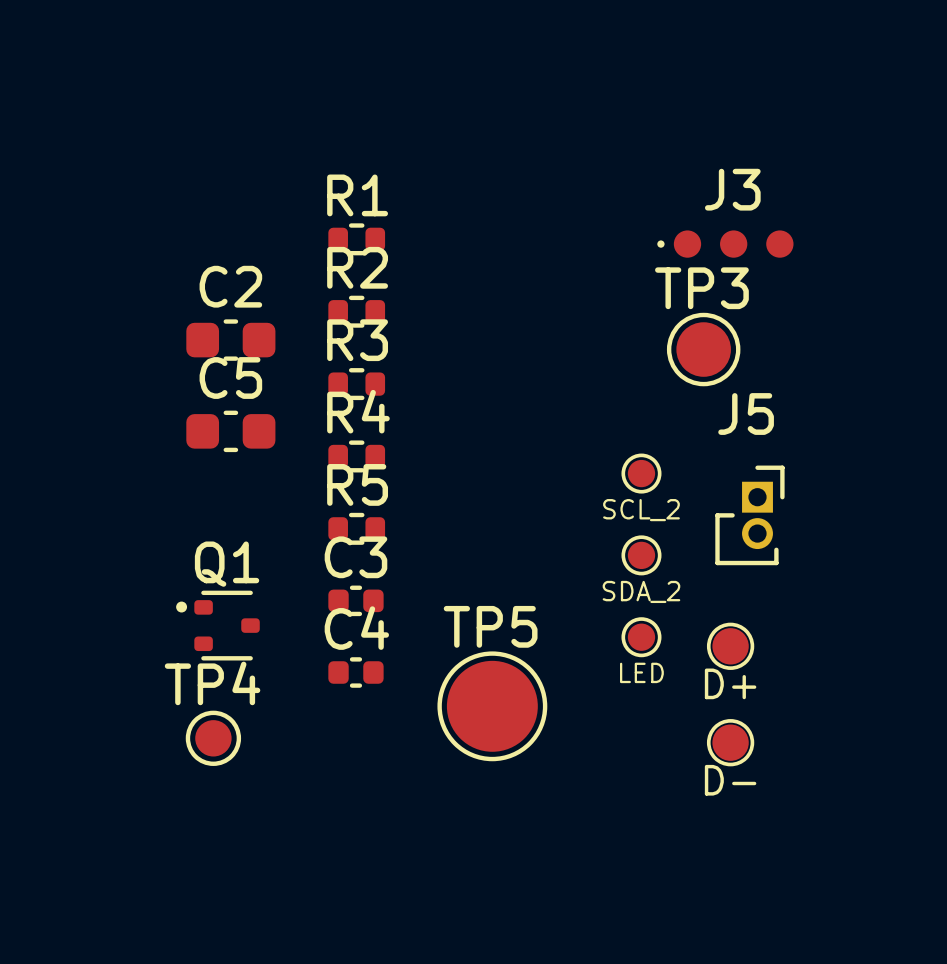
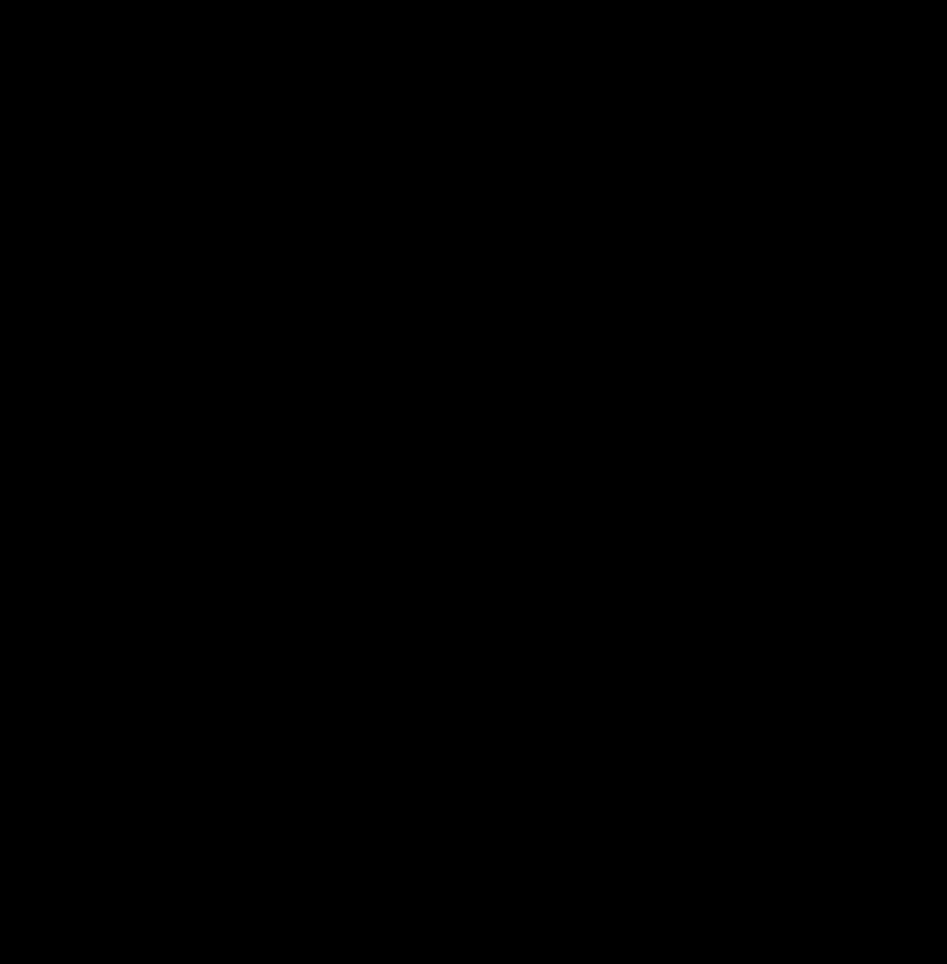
R1: (356, 239) -> none
J3: (725, 244) -> none
R2: (356, 311) -> none
C2: (230, 340) -> none
TP3: (703, 349) -> none
R3: (356, 384) -> none
C5: (230, 431) -> none
R4: (356, 456) -> none
part: SCL_2 (641, 473) -> none
J5: (749, 515) -> none
R5: (356, 528) -> none
part: SDA_2 (641, 555) -> none
C3: (355, 600) -> none
Q1: (217, 625) -> none
part: LED (641, 637) -> none
part: D+ (730, 646) -> none
C4: (355, 672) -> none
TP5: (492, 706) -> none
TP4: (213, 738) -> none
part: D- (730, 742) -> none

